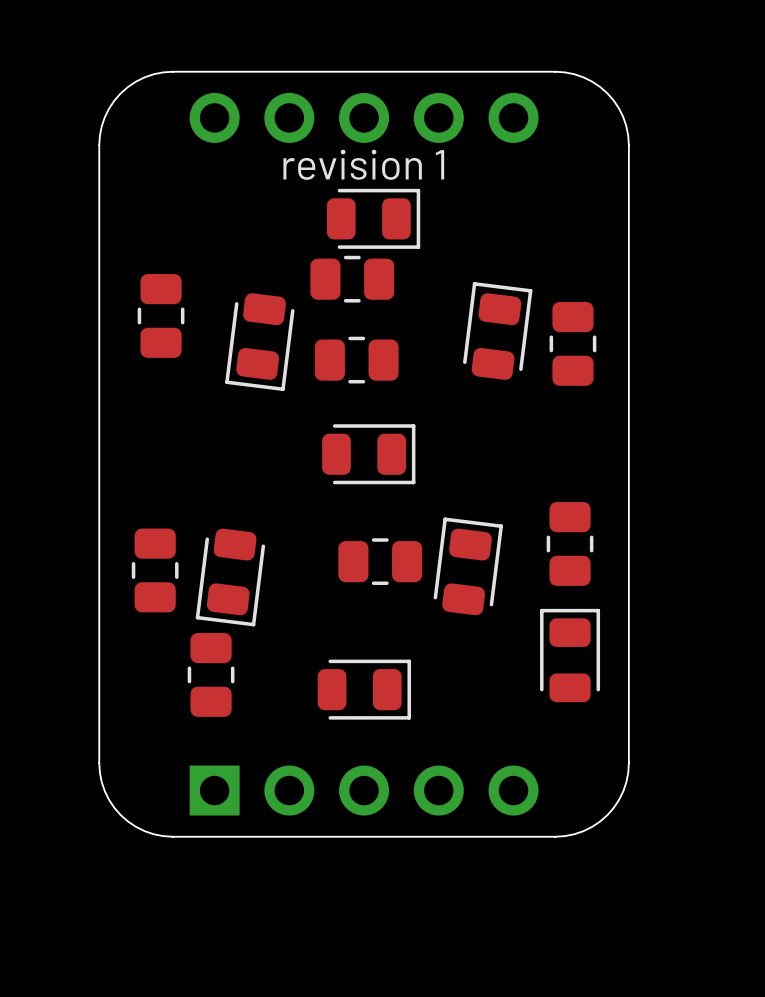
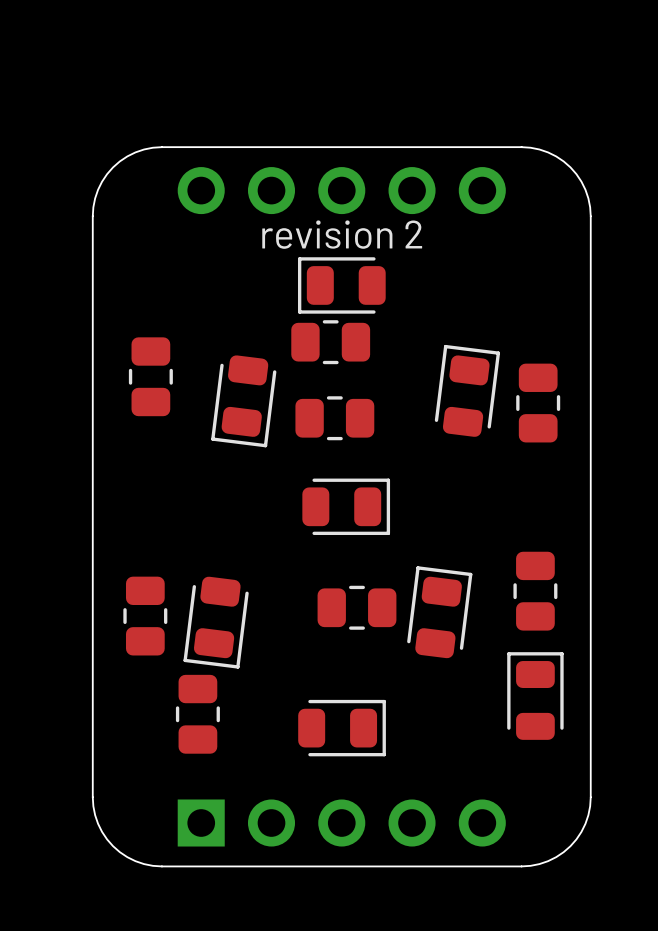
text: revision 1 (363, 164) -> revision 2 (342, 234)
part rotation: 0° (373, 218) -> 180° (341, 285)

